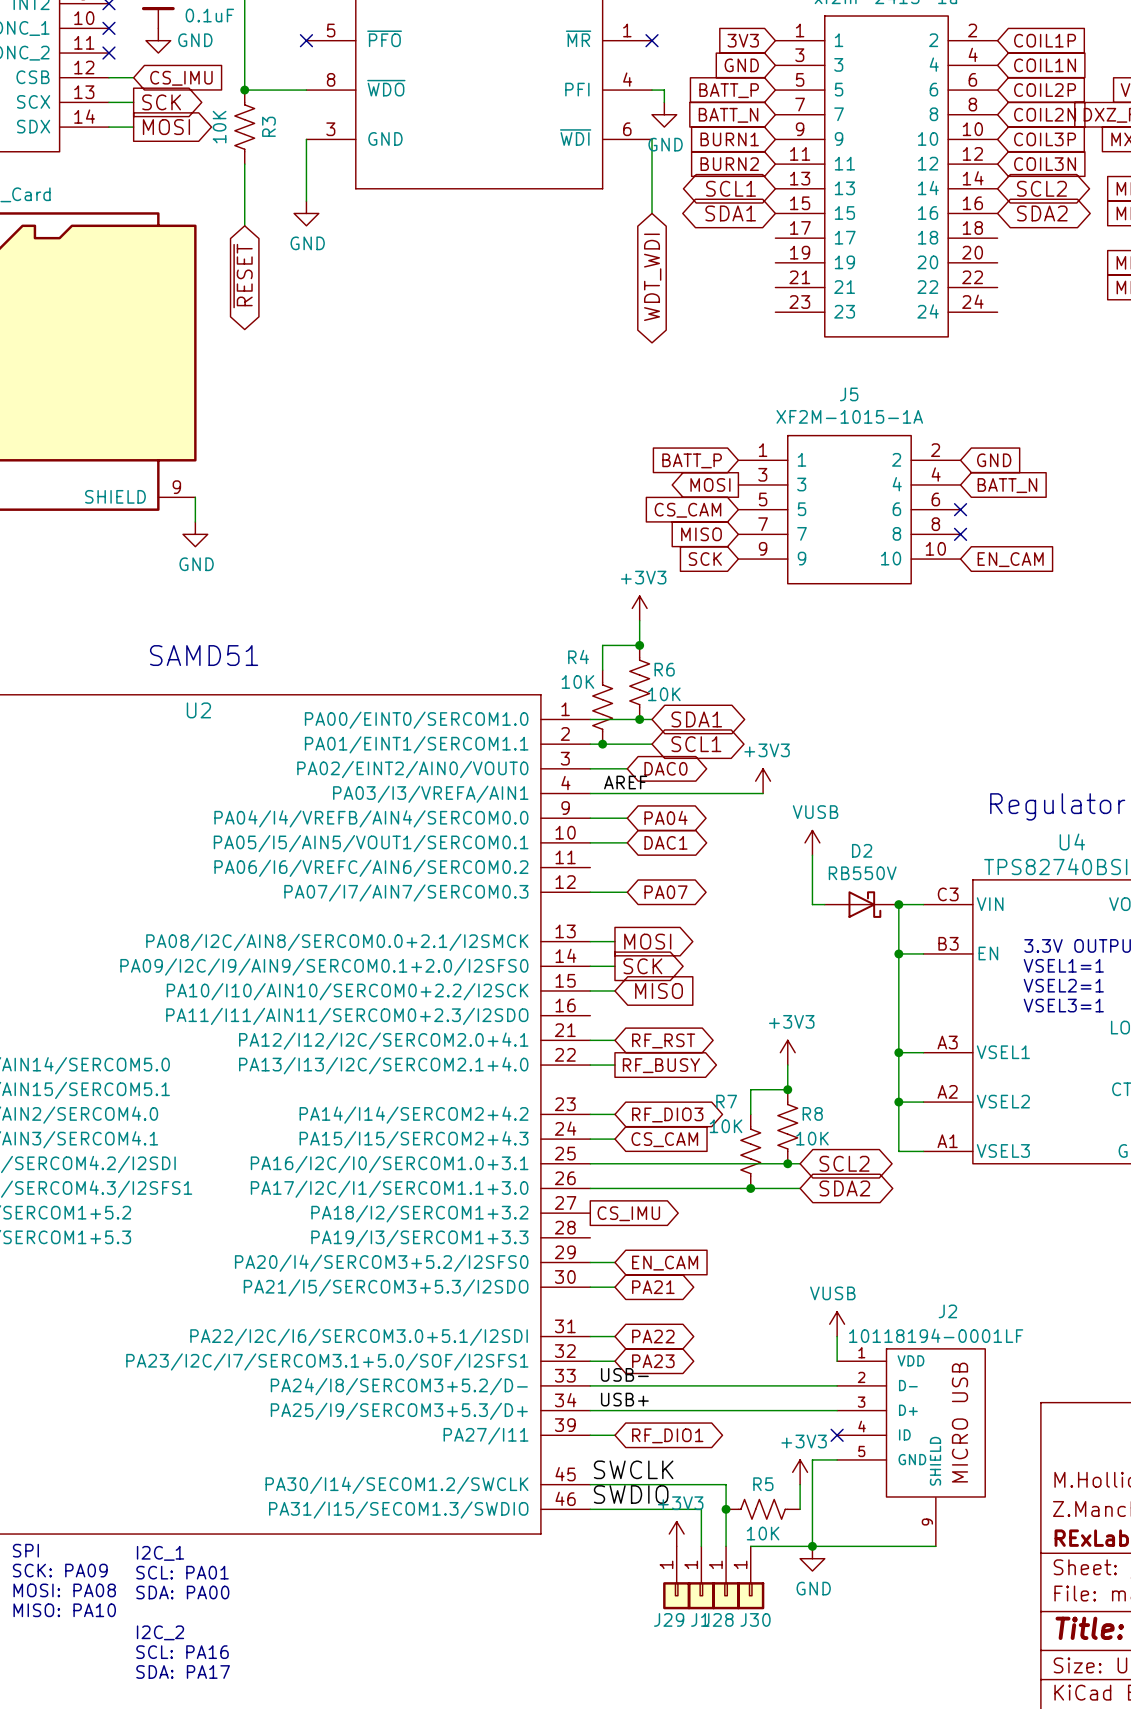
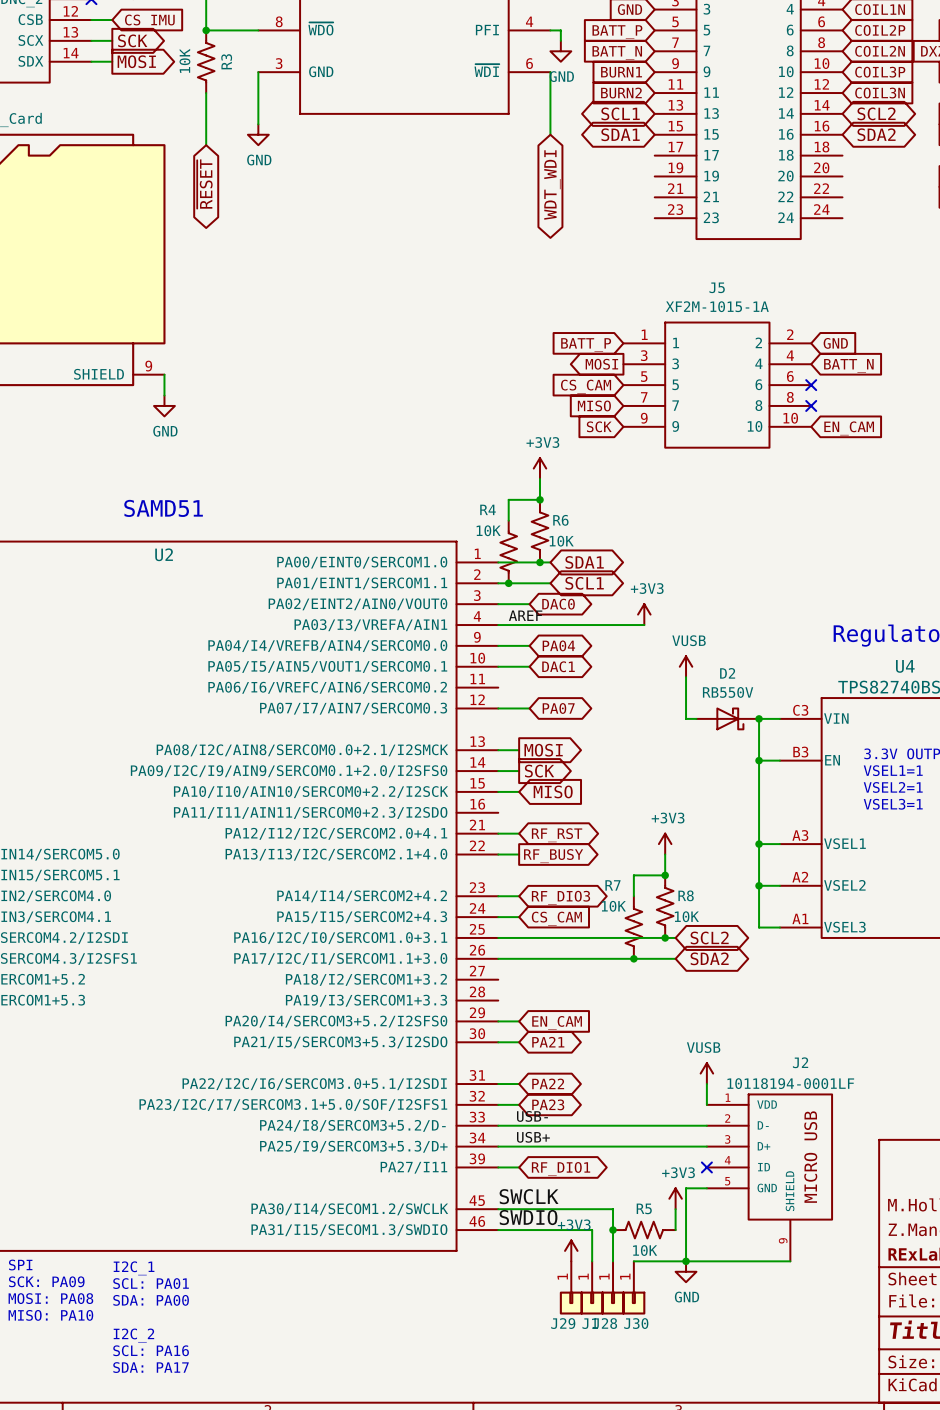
global label: CS_IMU (628, 1213) -> none

